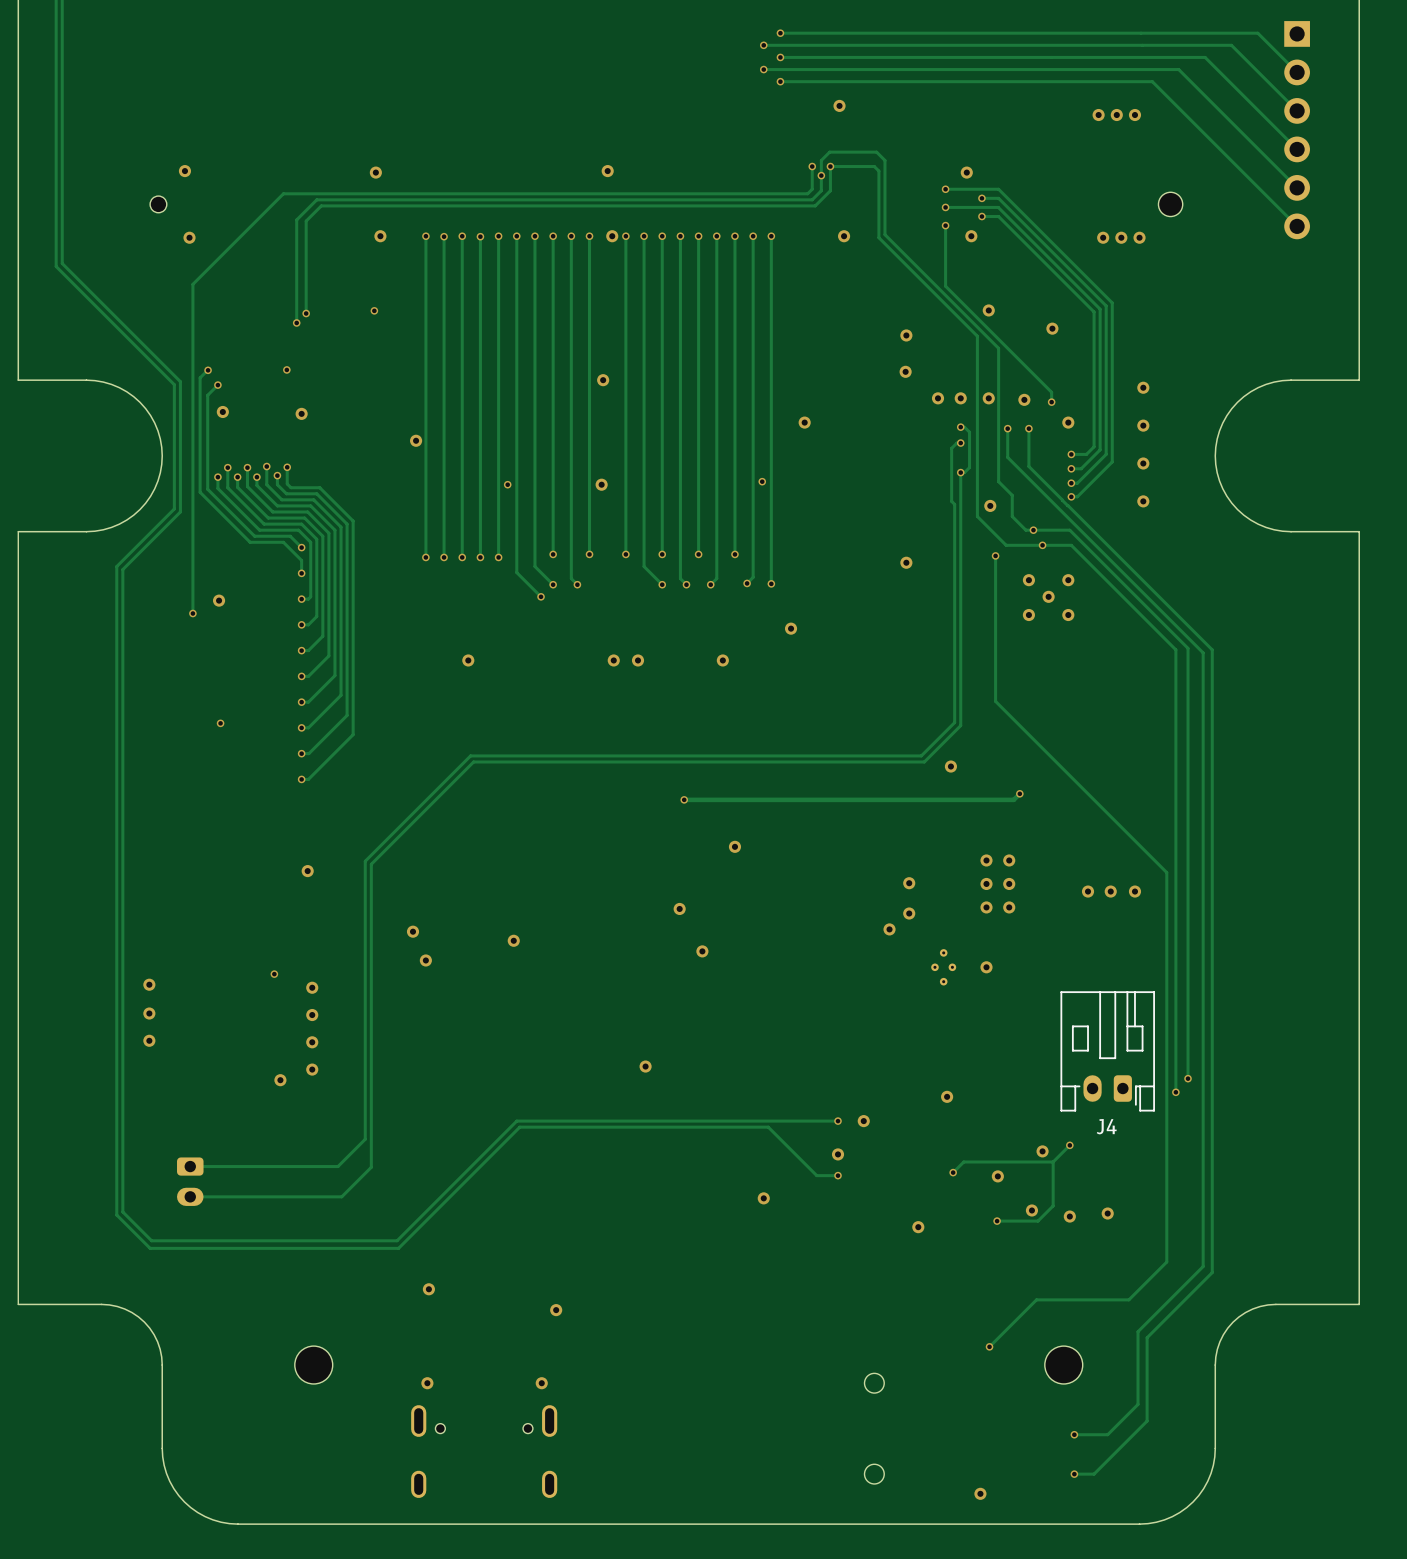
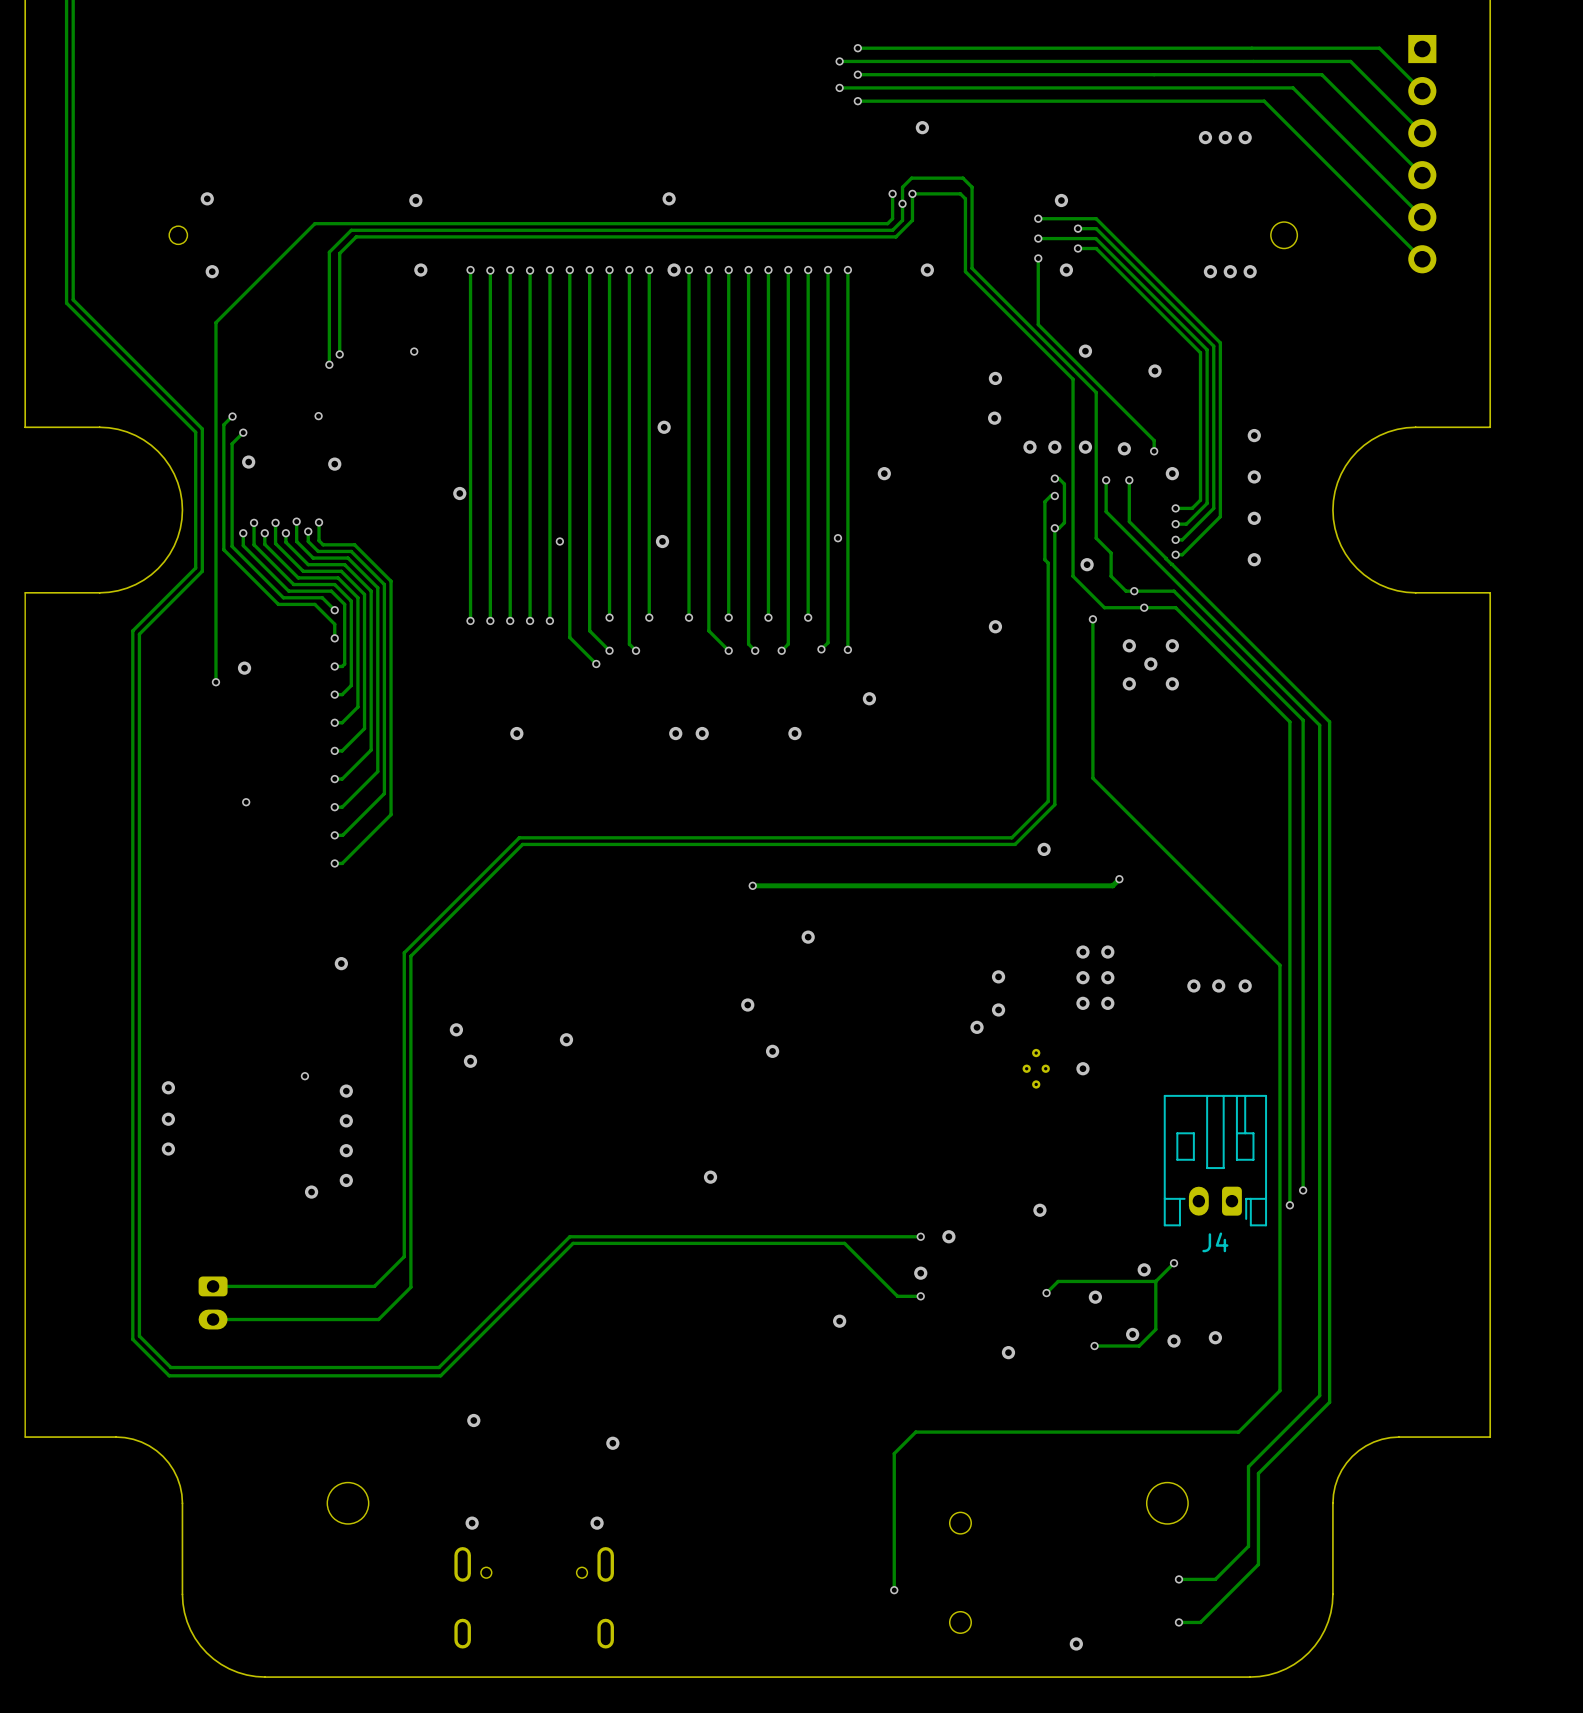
track: (1036, 1299) (989, 1346) -> (1137, 1432) (915, 1432) (894, 1453) (894, 1590)
via: (989, 1346) -> none
via: none -> (894, 1590)

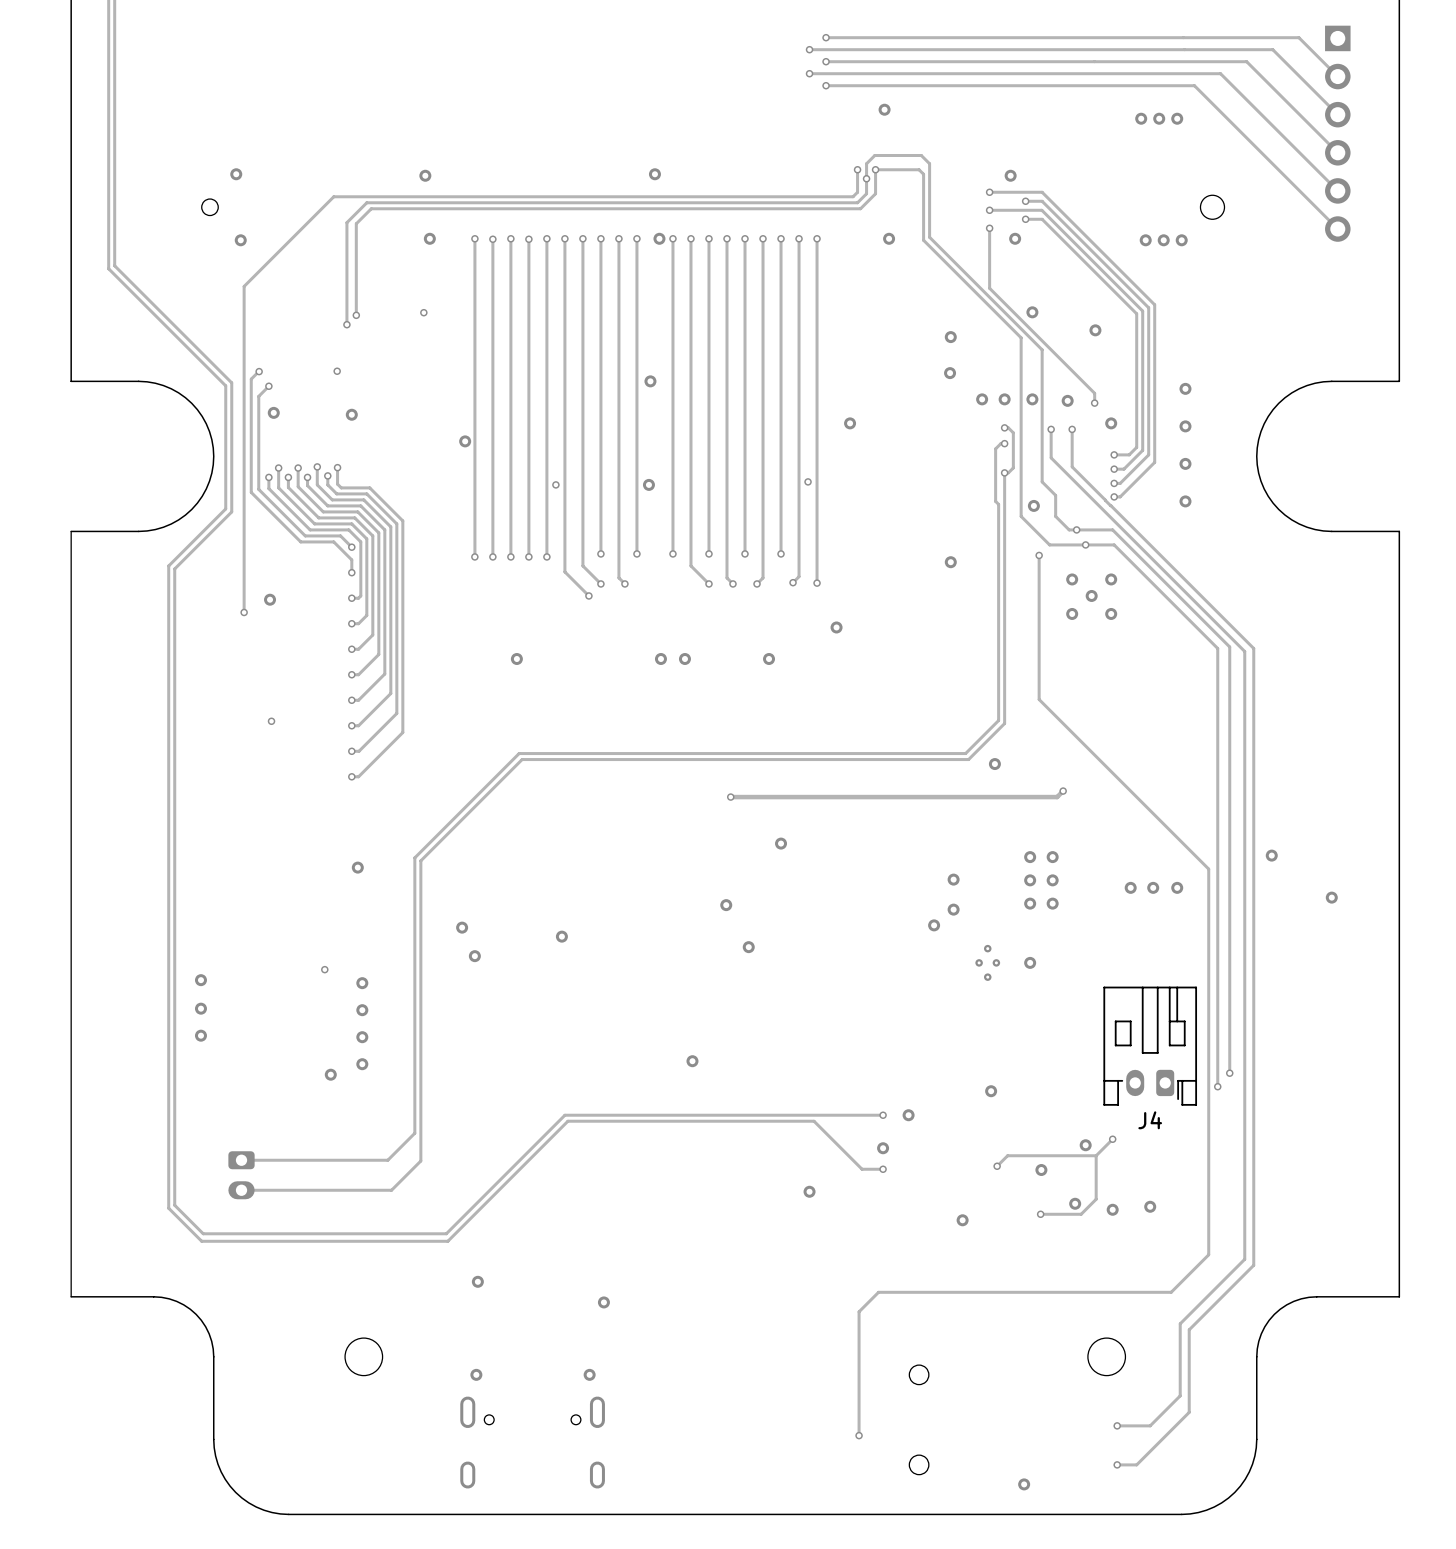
via: none -> (1271, 855)
via: none -> (1331, 897)

